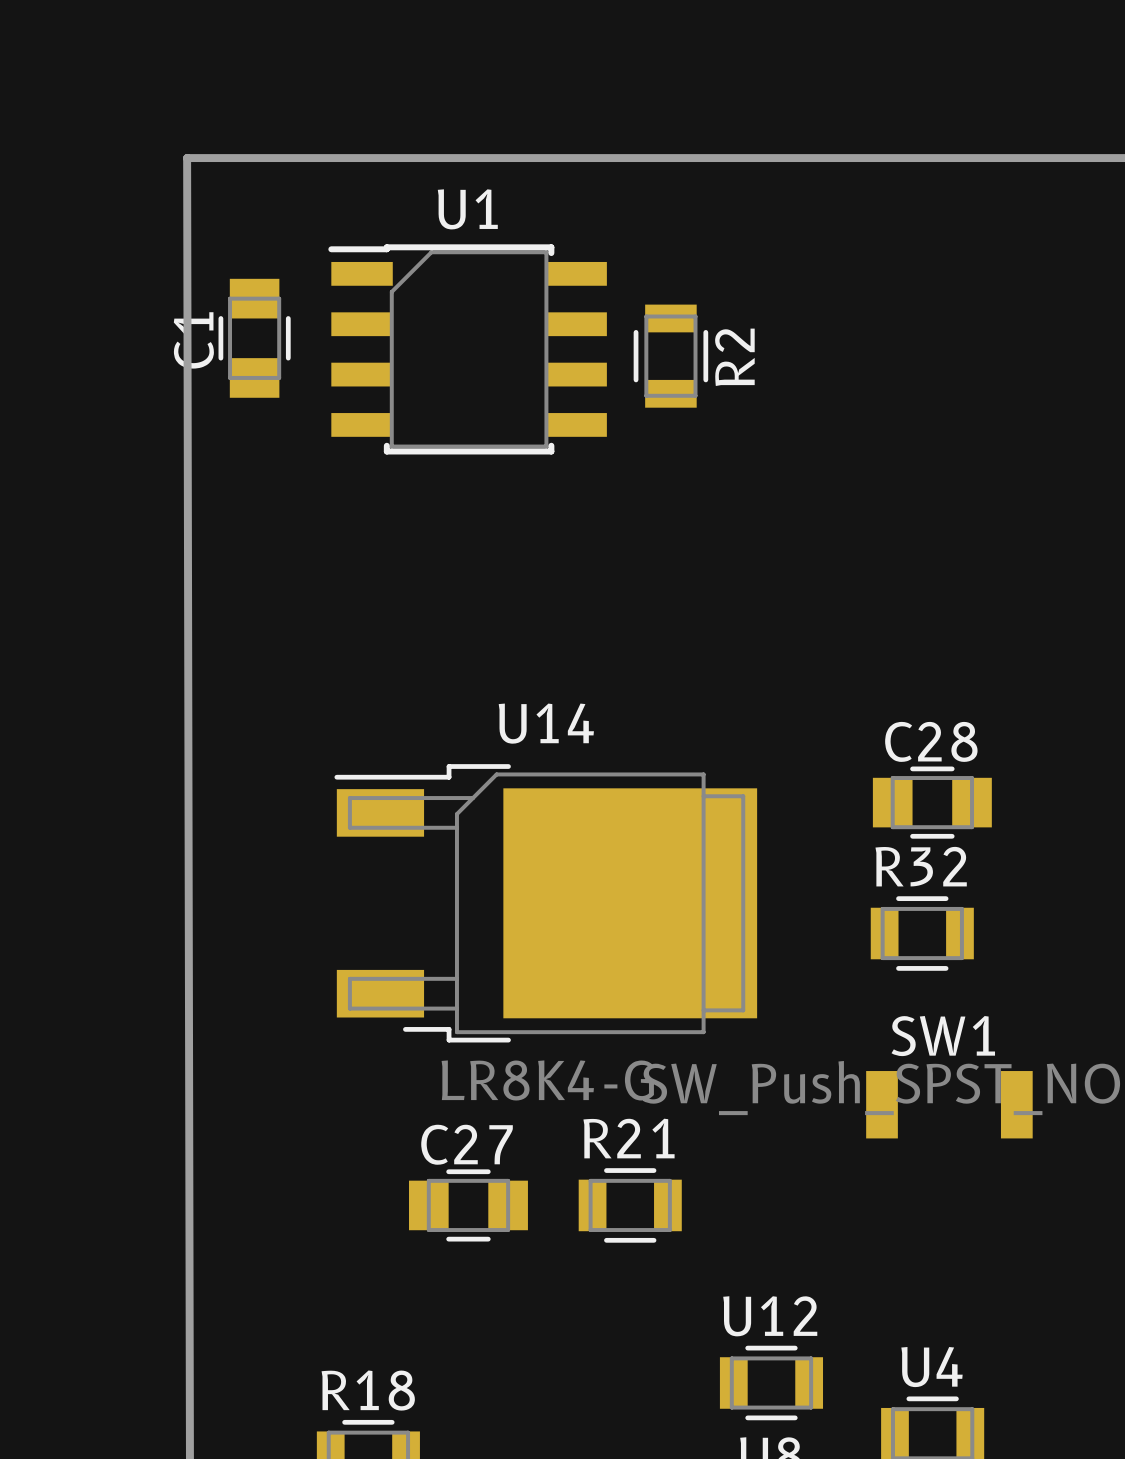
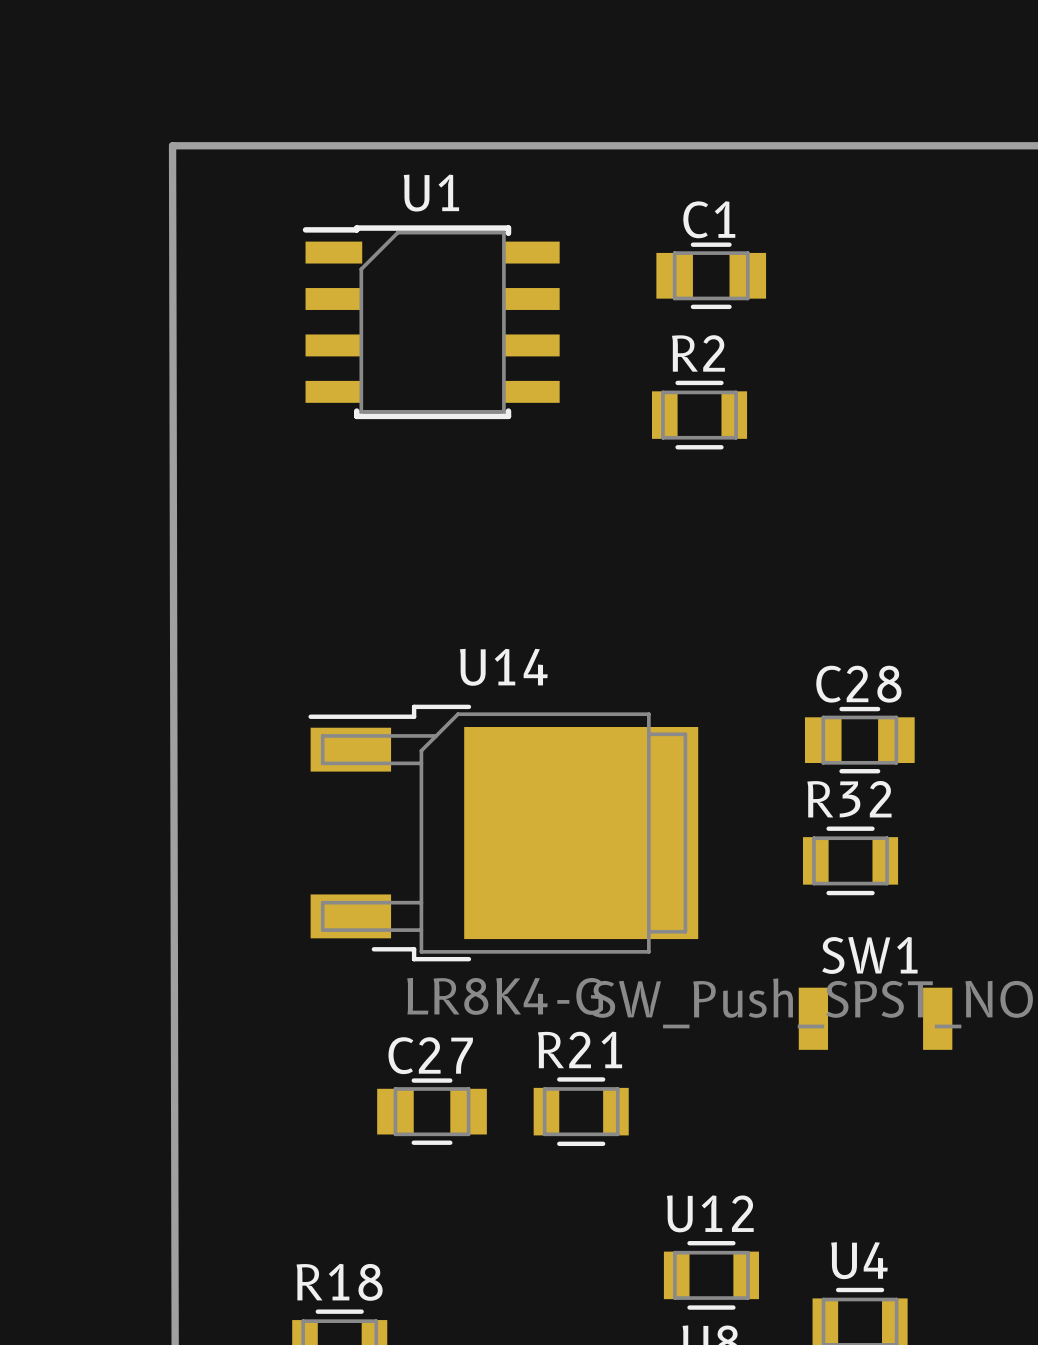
C1 rotation: 0° (254, 338) -> 90° clockwise (711, 275)
C1 position: (254, 338) -> (711, 275)
R2 rotation: 0° (670, 356) -> 90° clockwise (699, 415)
R2 position: (670, 356) -> (699, 415)
R2 name position: R2 (734, 357) -> R2 (698, 353)

